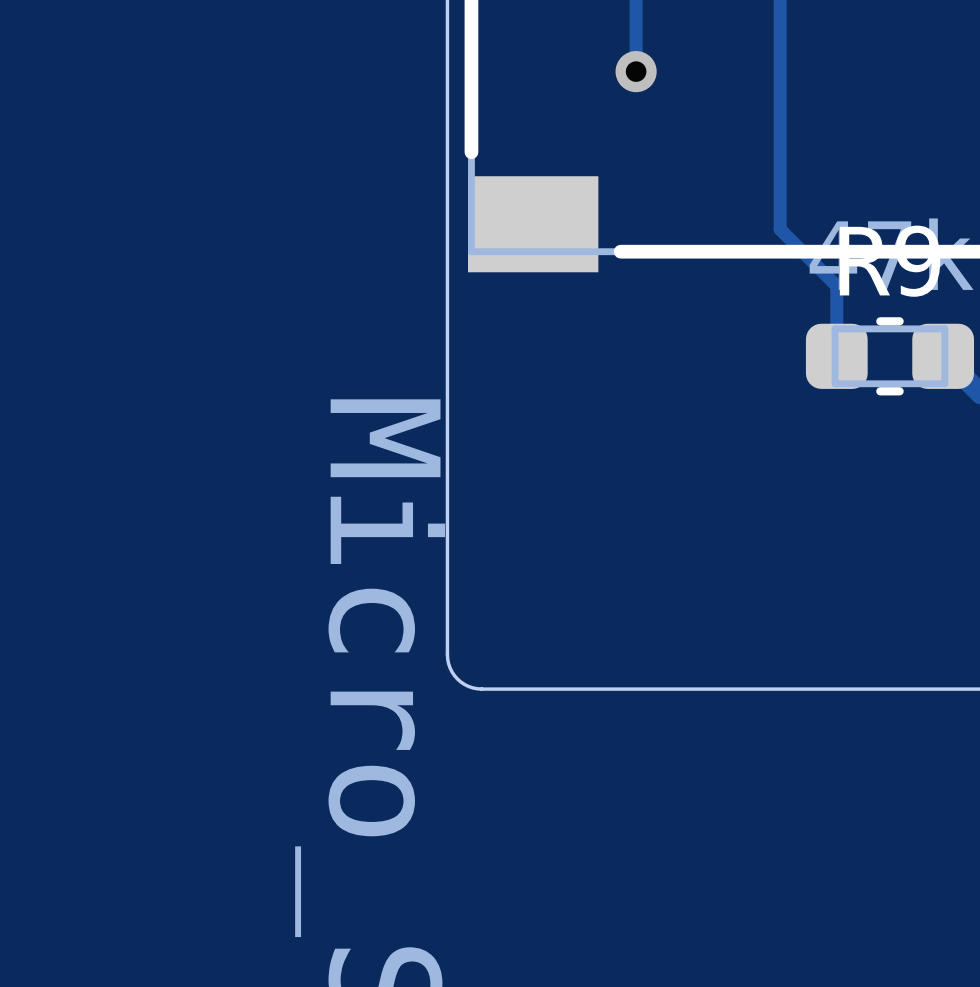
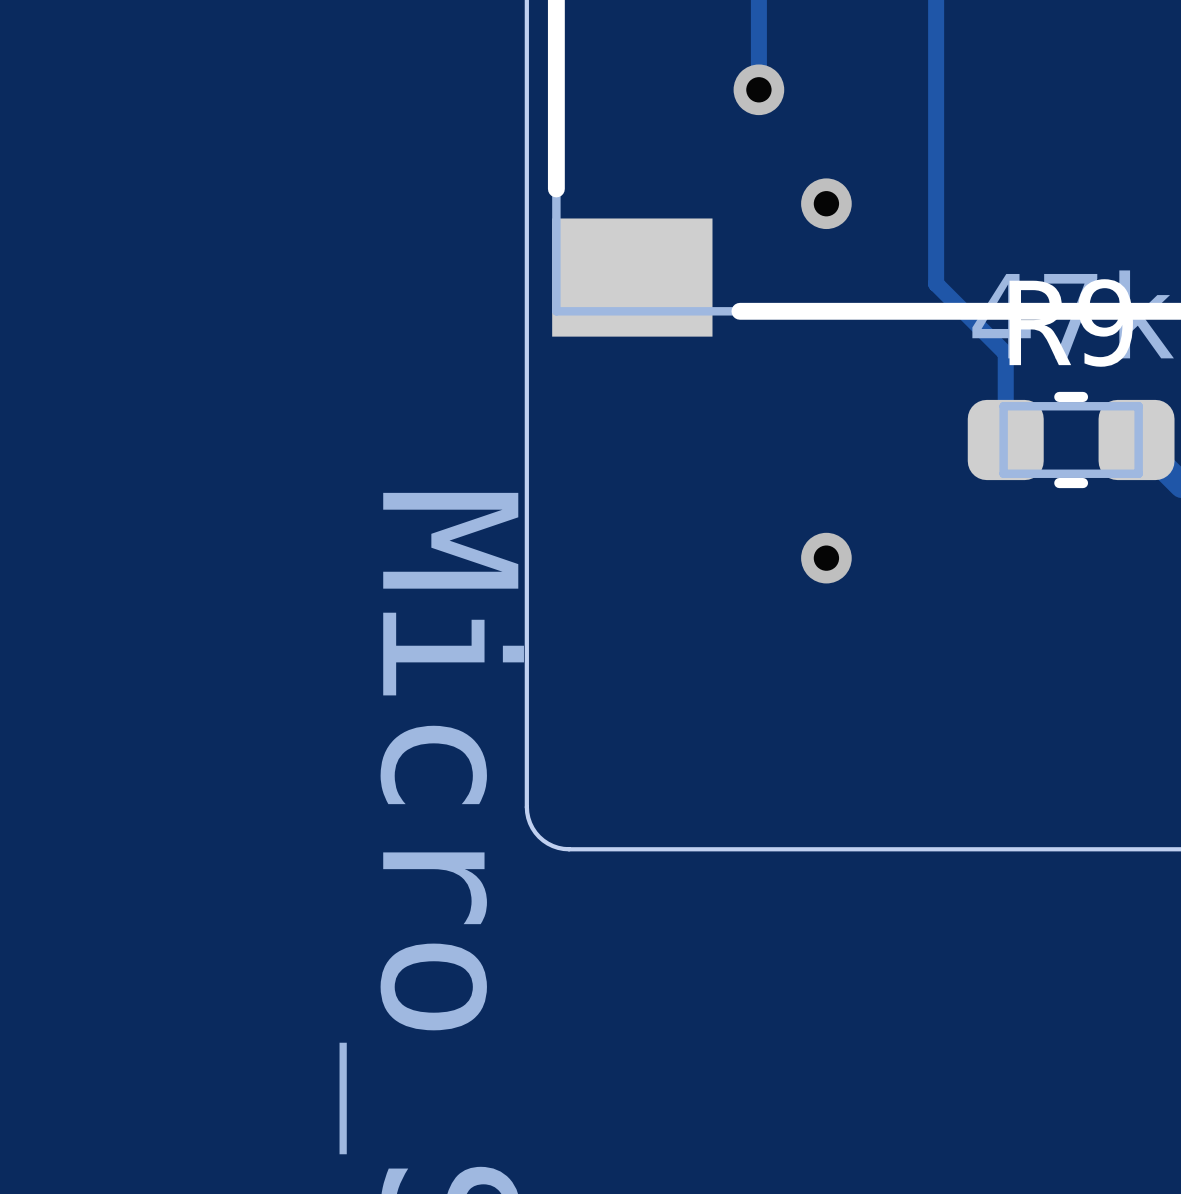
via: none -> (826, 203)
via: none -> (826, 558)

